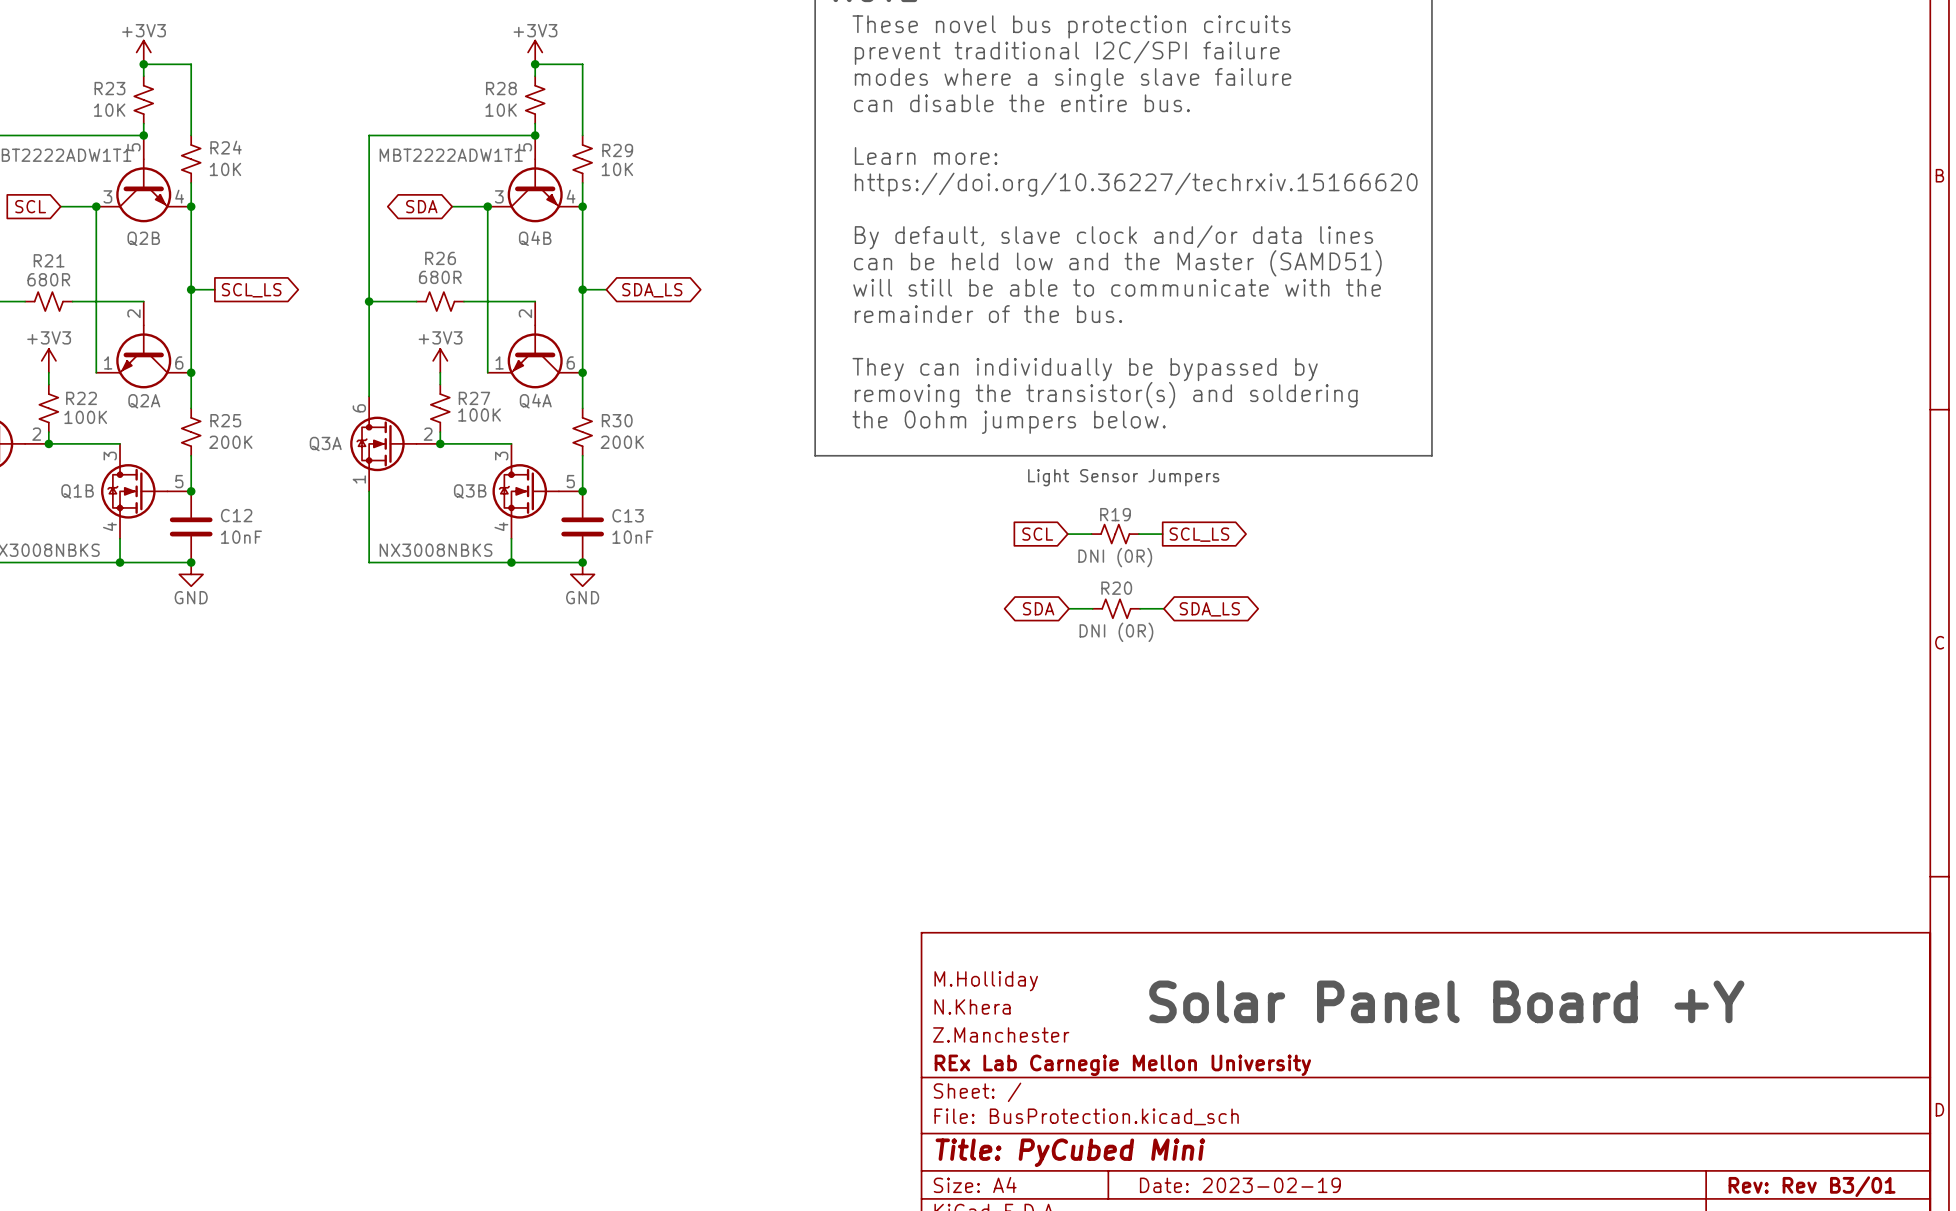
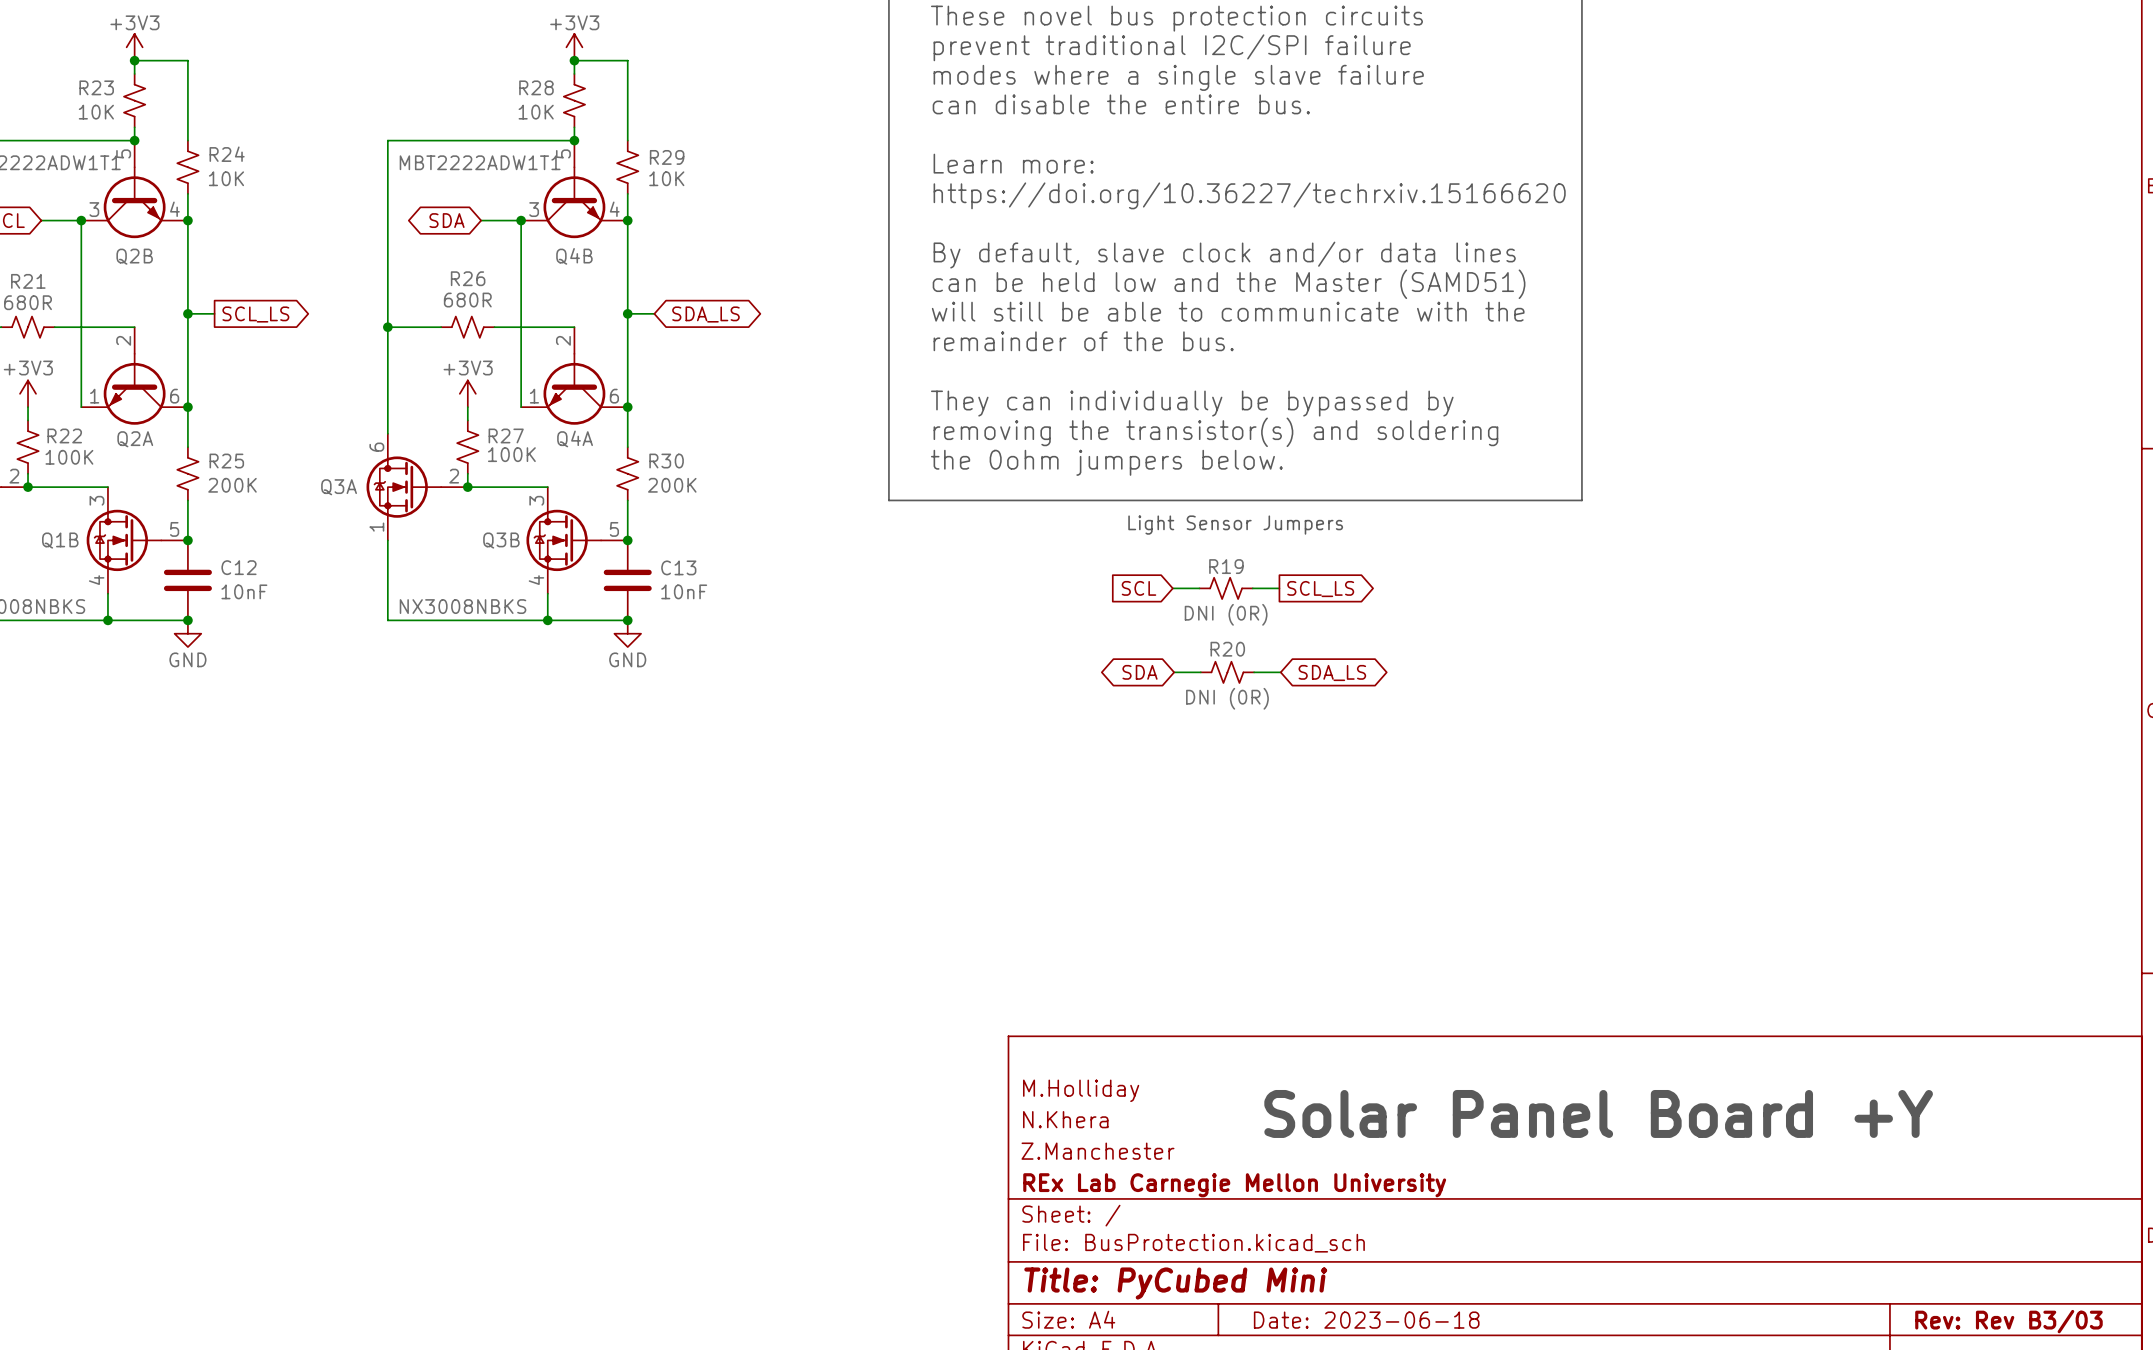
title block: Date: 2023-02-19 (1240, 1185) -> Date: 2023-06-18 (1366, 1320)
title block: Rev: Rev B3/01 (1812, 1186) -> Rev: Rev B3/03 (2008, 1321)

